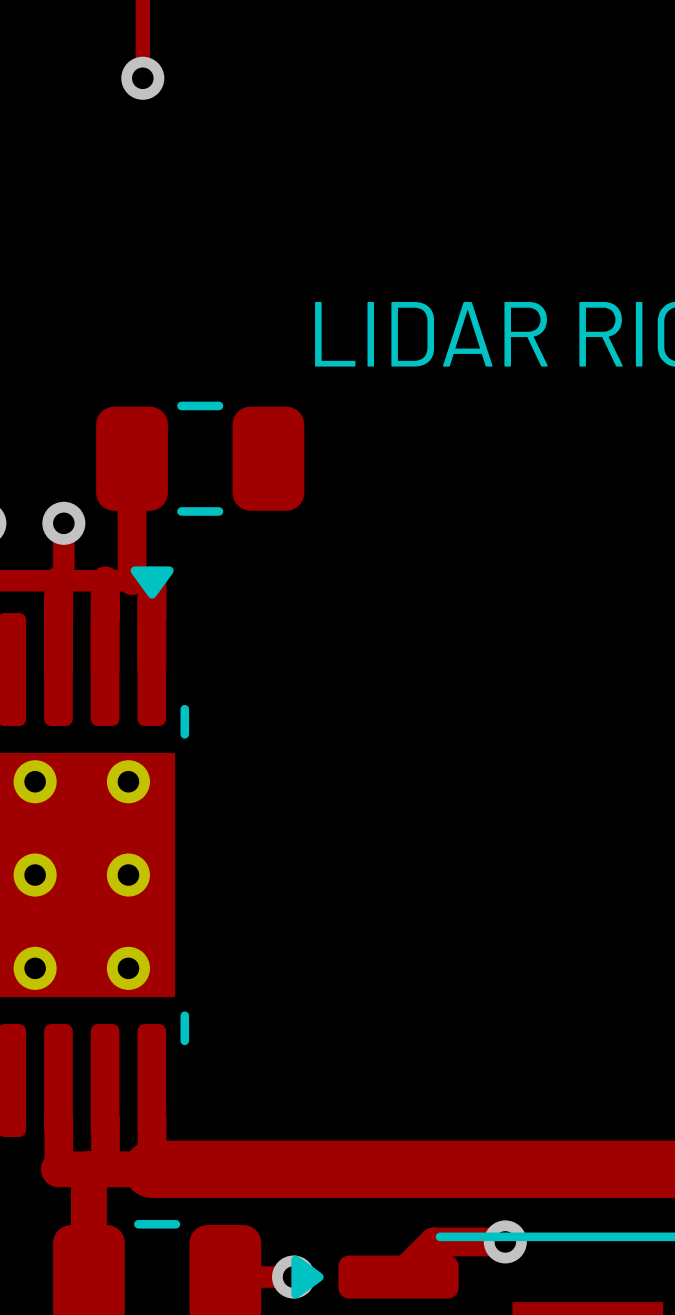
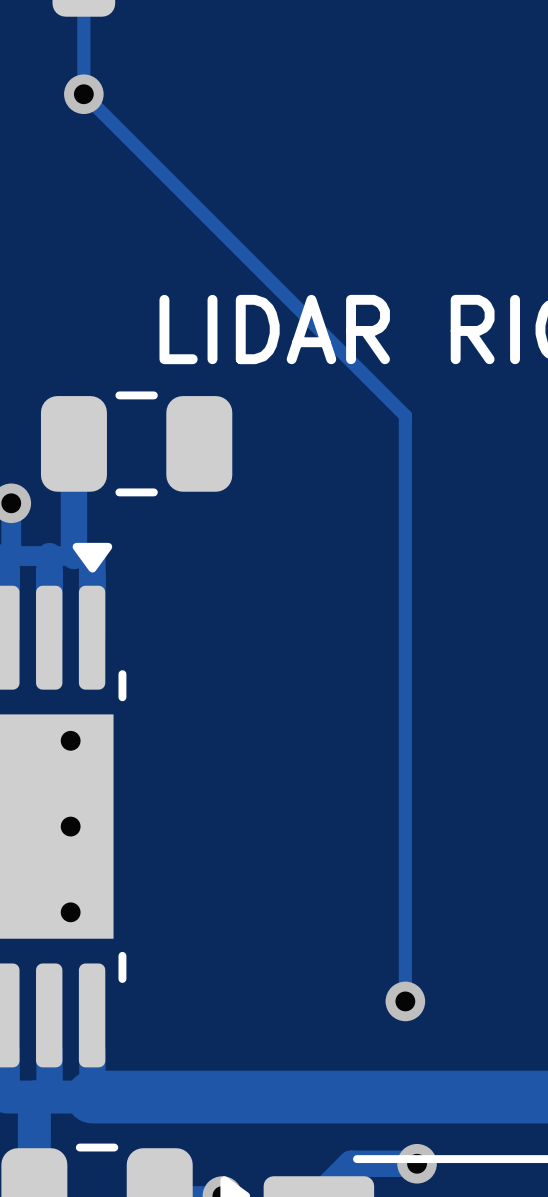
track: none -> (83, 94) (405, 415) (405, 1001)
via: none -> (405, 1001)

